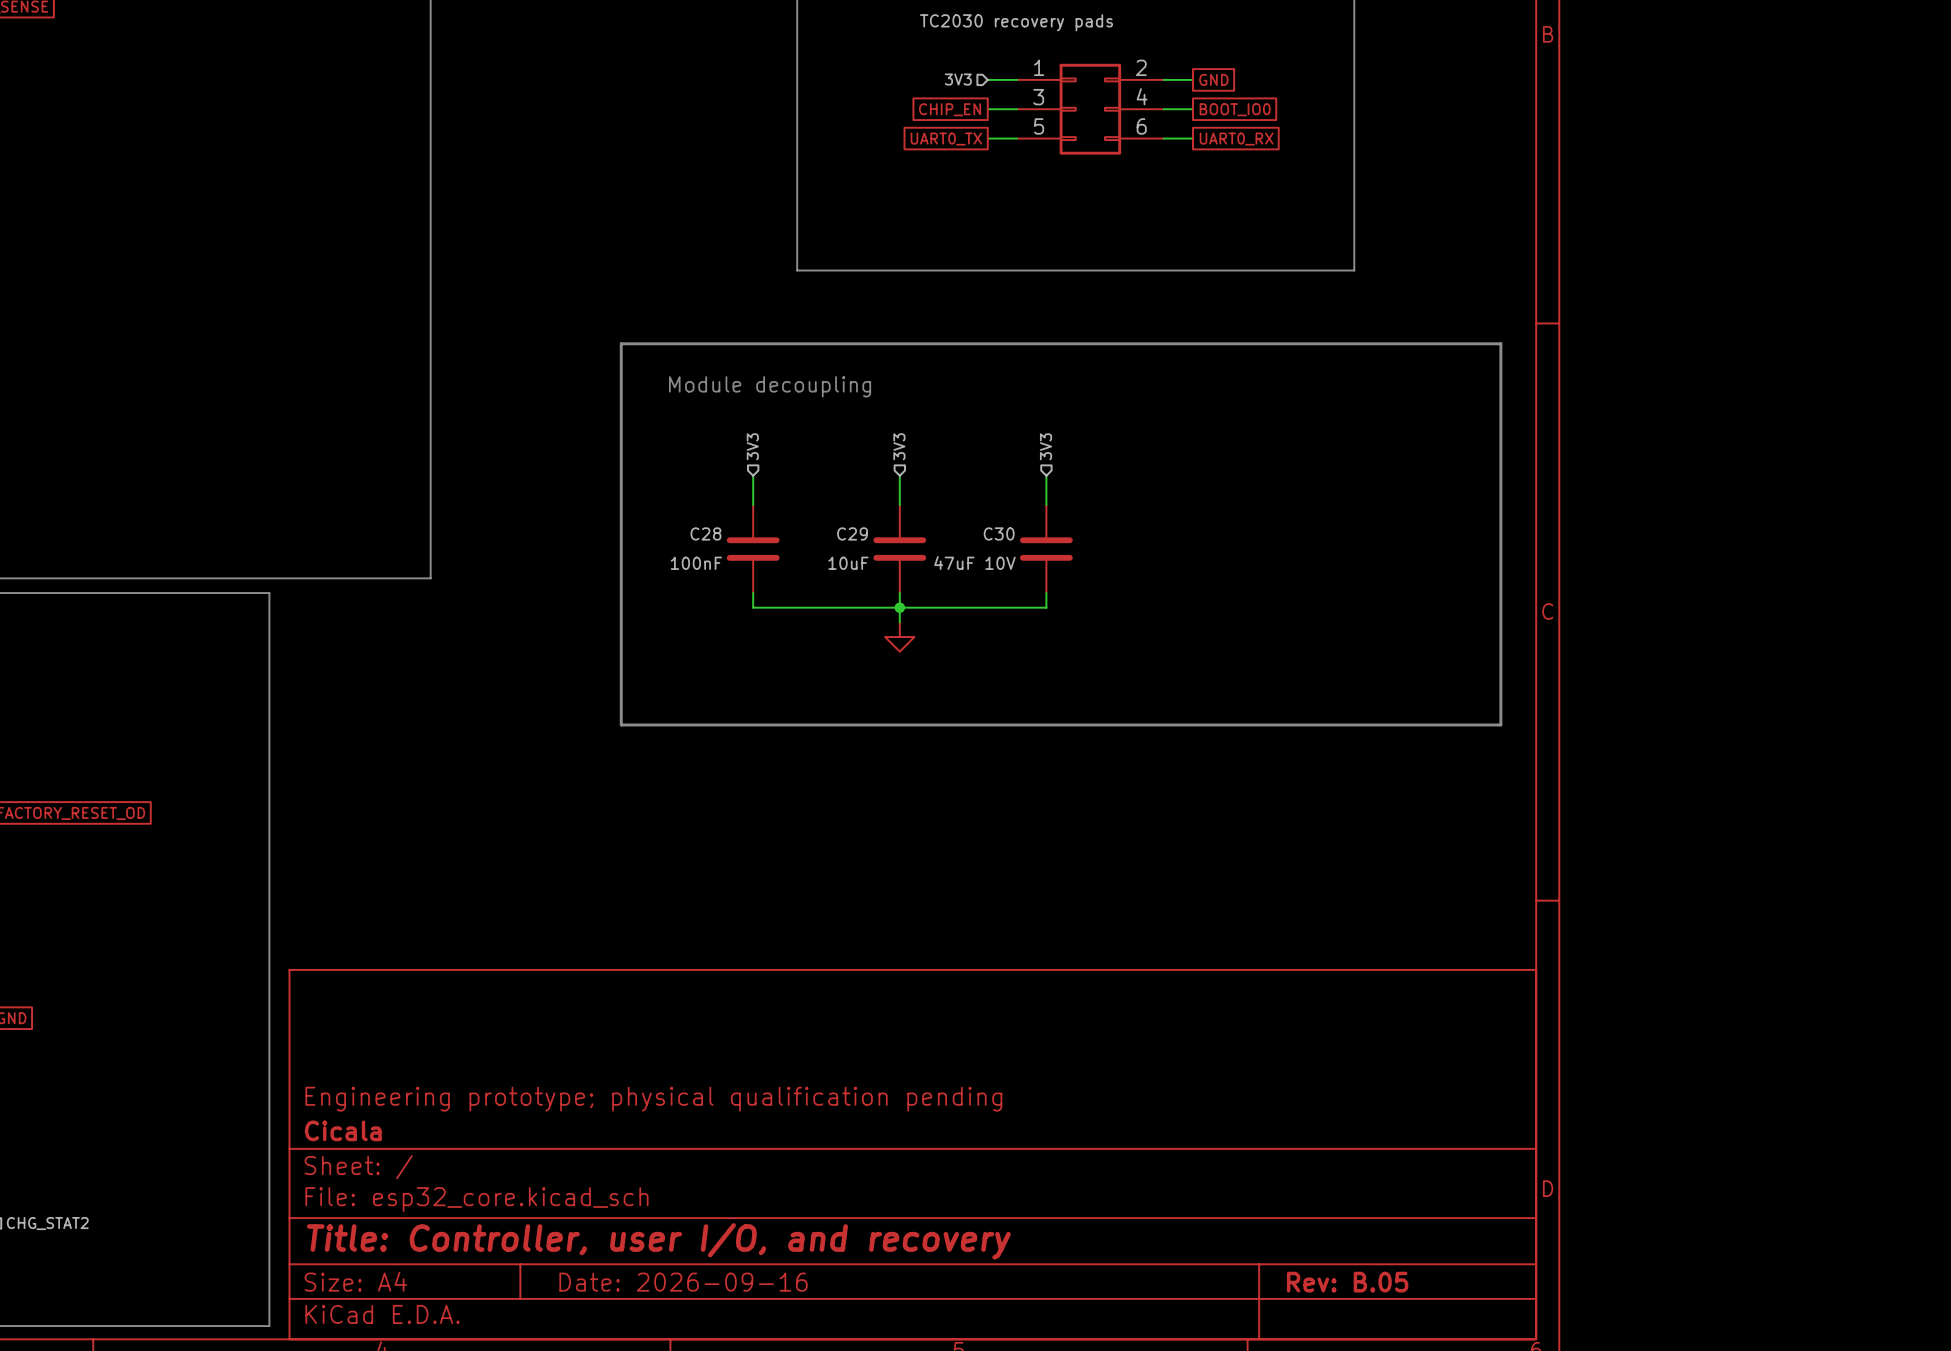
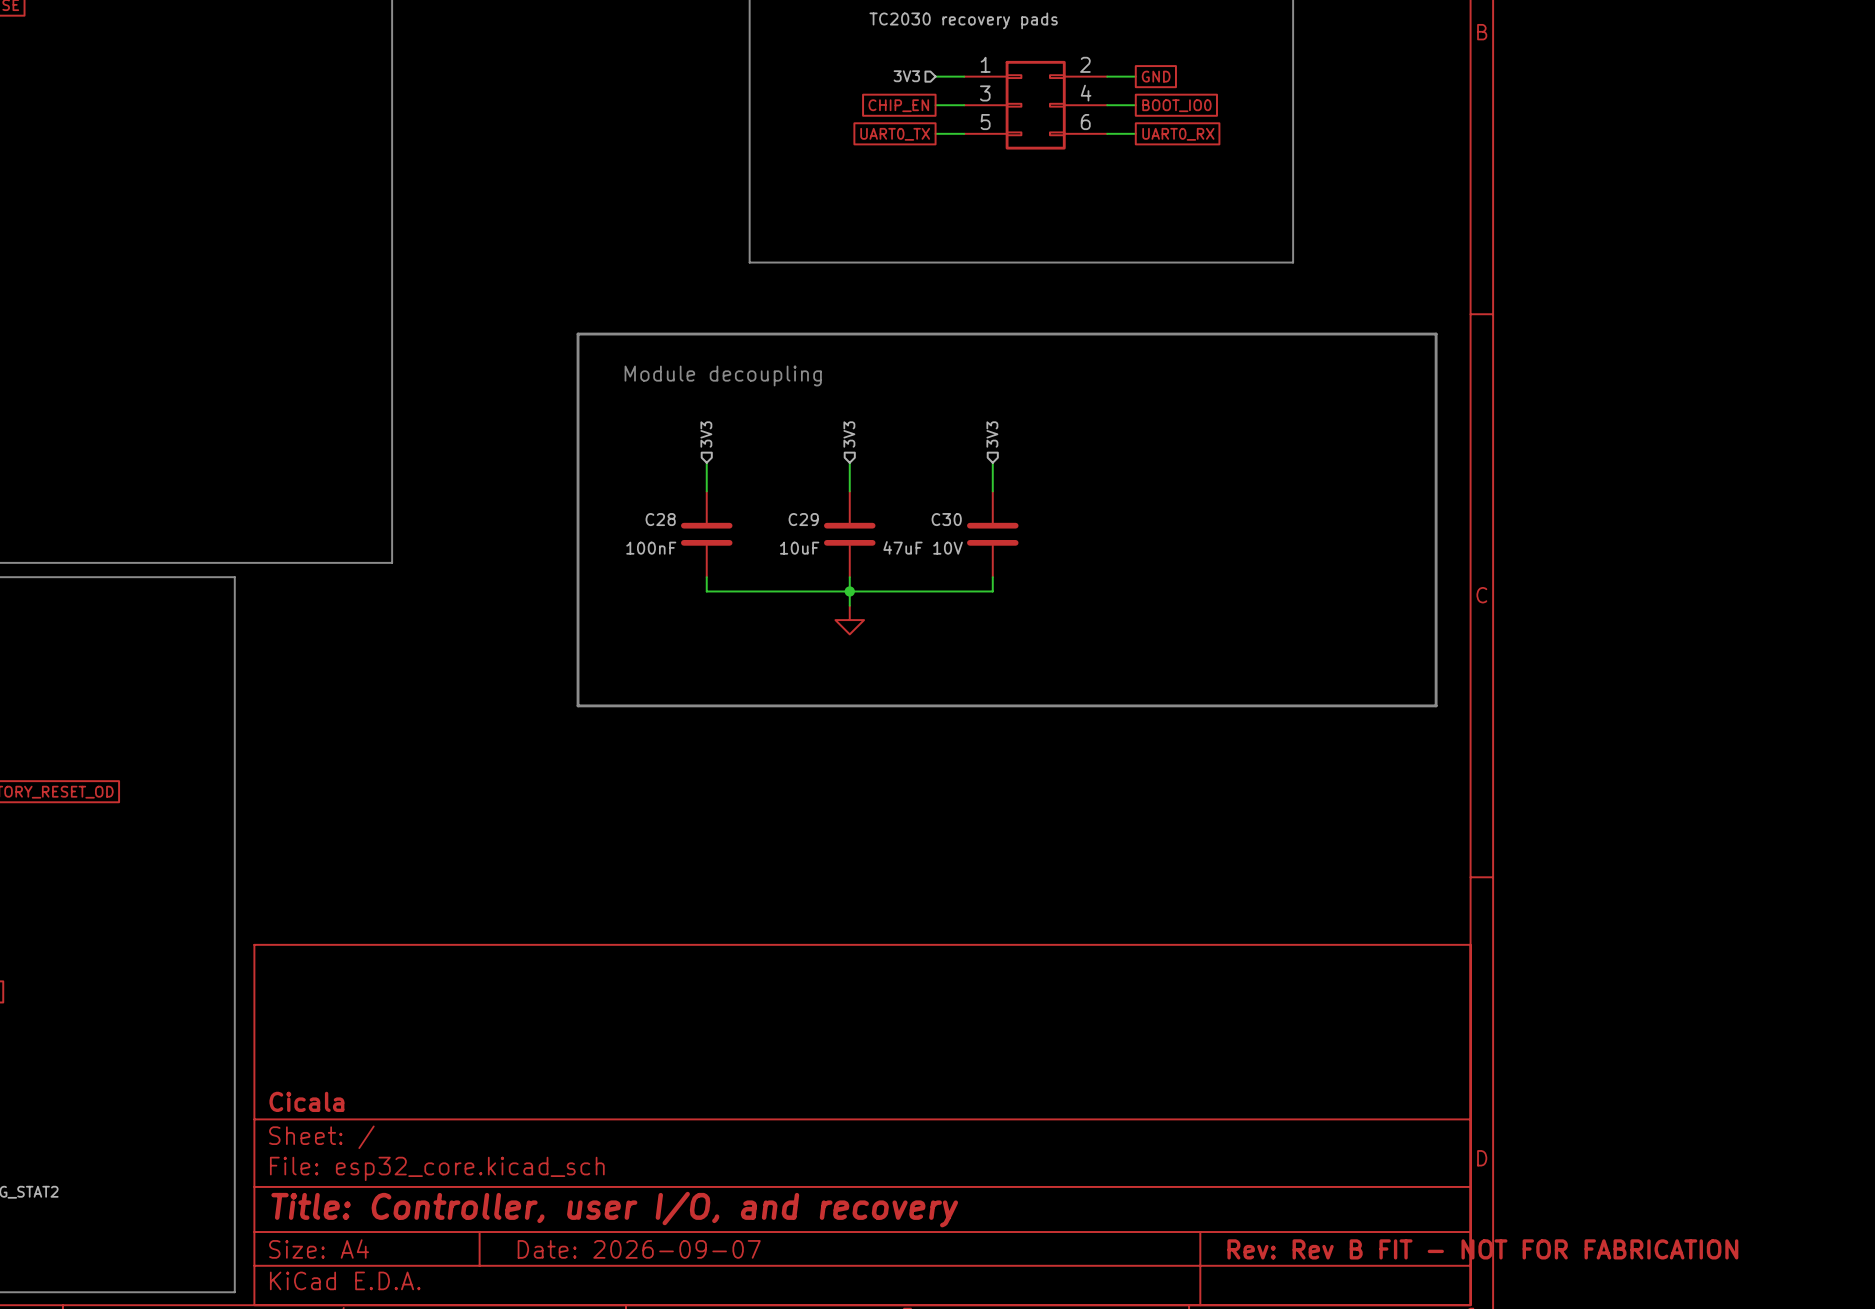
title block: Engineering prototype; physical qualification pending (653, 1099) -> none
title block: Date: 2026-09-16 (683, 1282) -> Date: 2026-09-07 (639, 1249)
title block: Rev: B.05 (1347, 1282) -> Rev: Rev B FIT - NOT FOR FABRICATION (1482, 1249)

